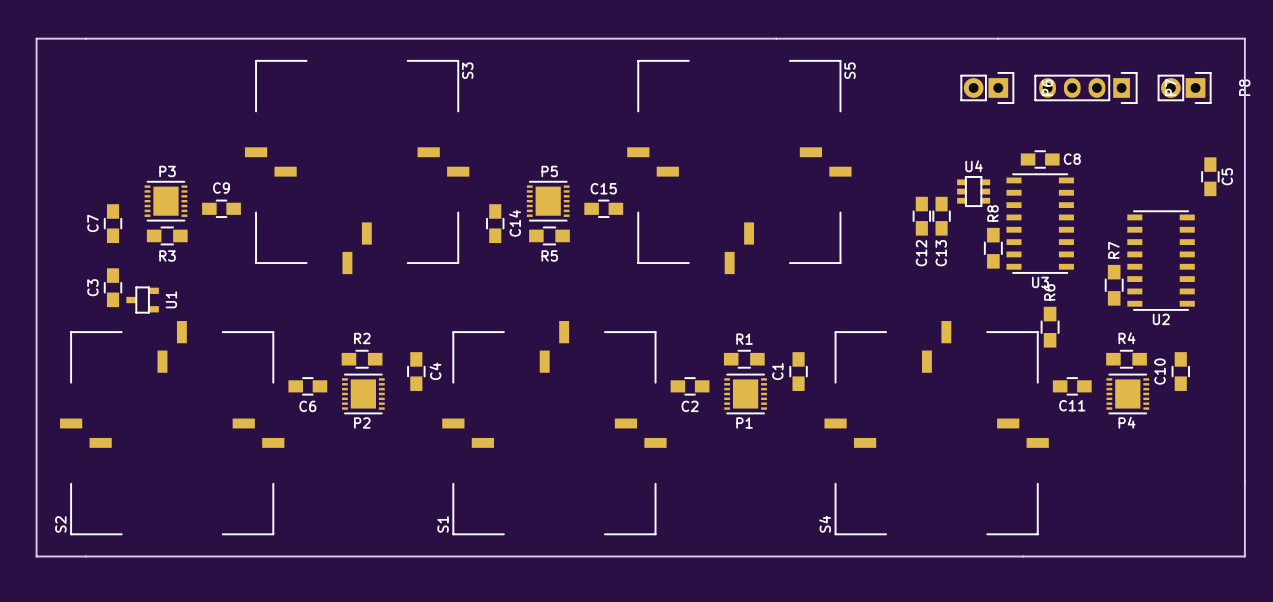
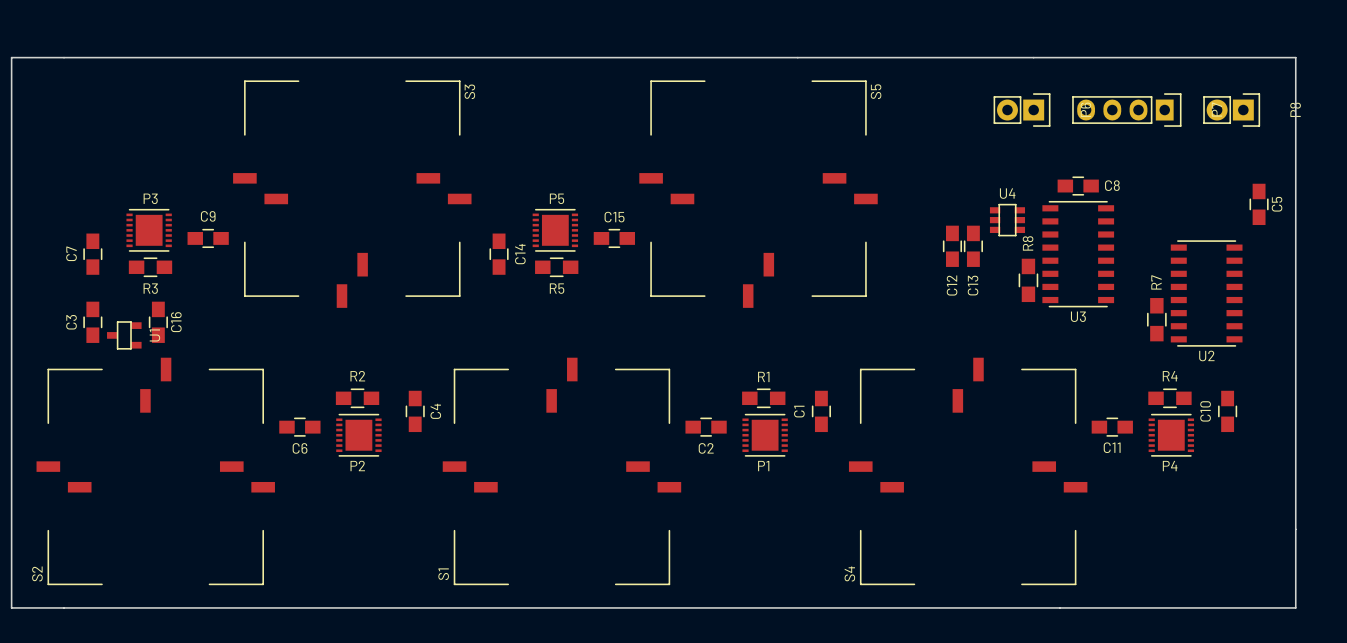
C16: none -> (158, 322)
R6: (1050, 327) -> none

